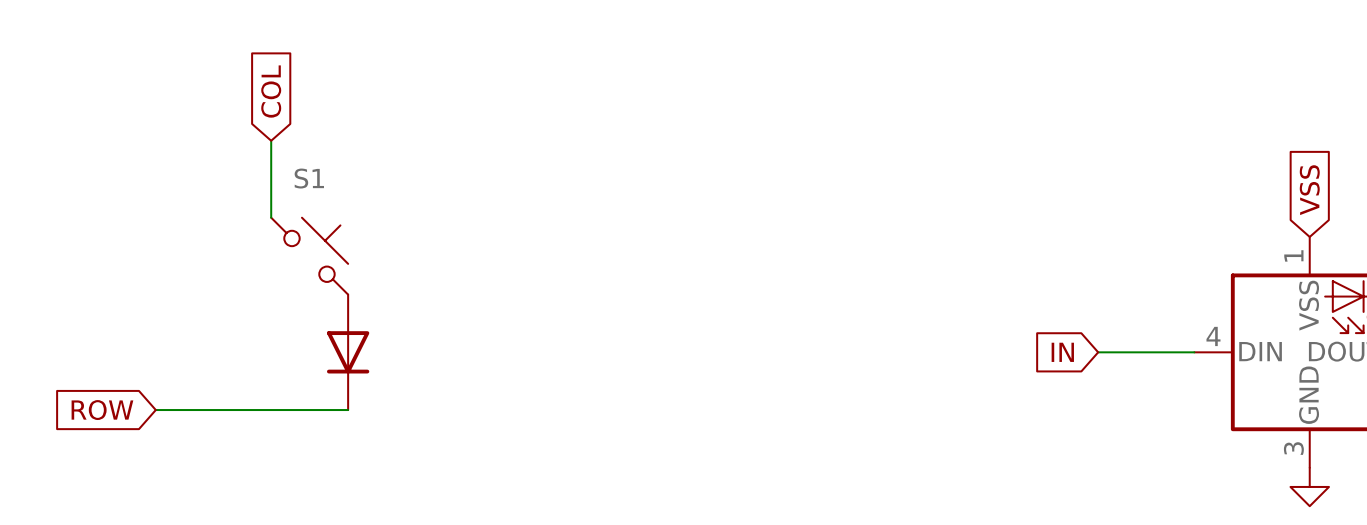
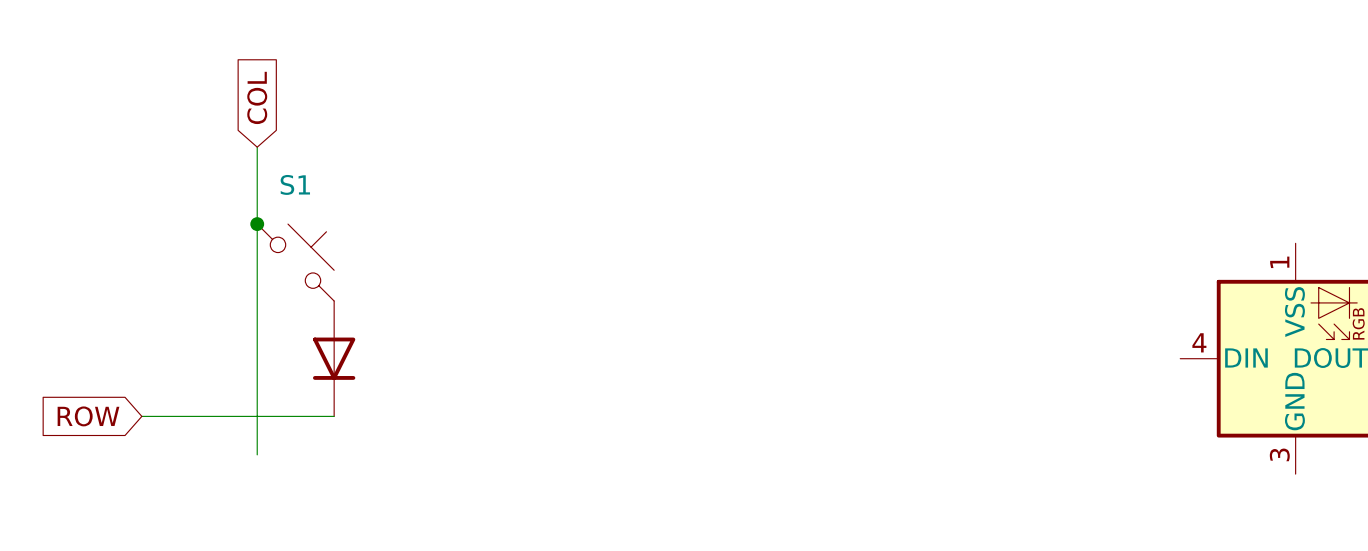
global label: VSS (1309, 190) -> none
wire: none -> (257, 224) (257, 454)
junction: none -> (257, 224)
global label: IN (1062, 352) -> none
wire: (1098, 352) (1194, 352) -> none
power symbol: (1309, 486) -> none

